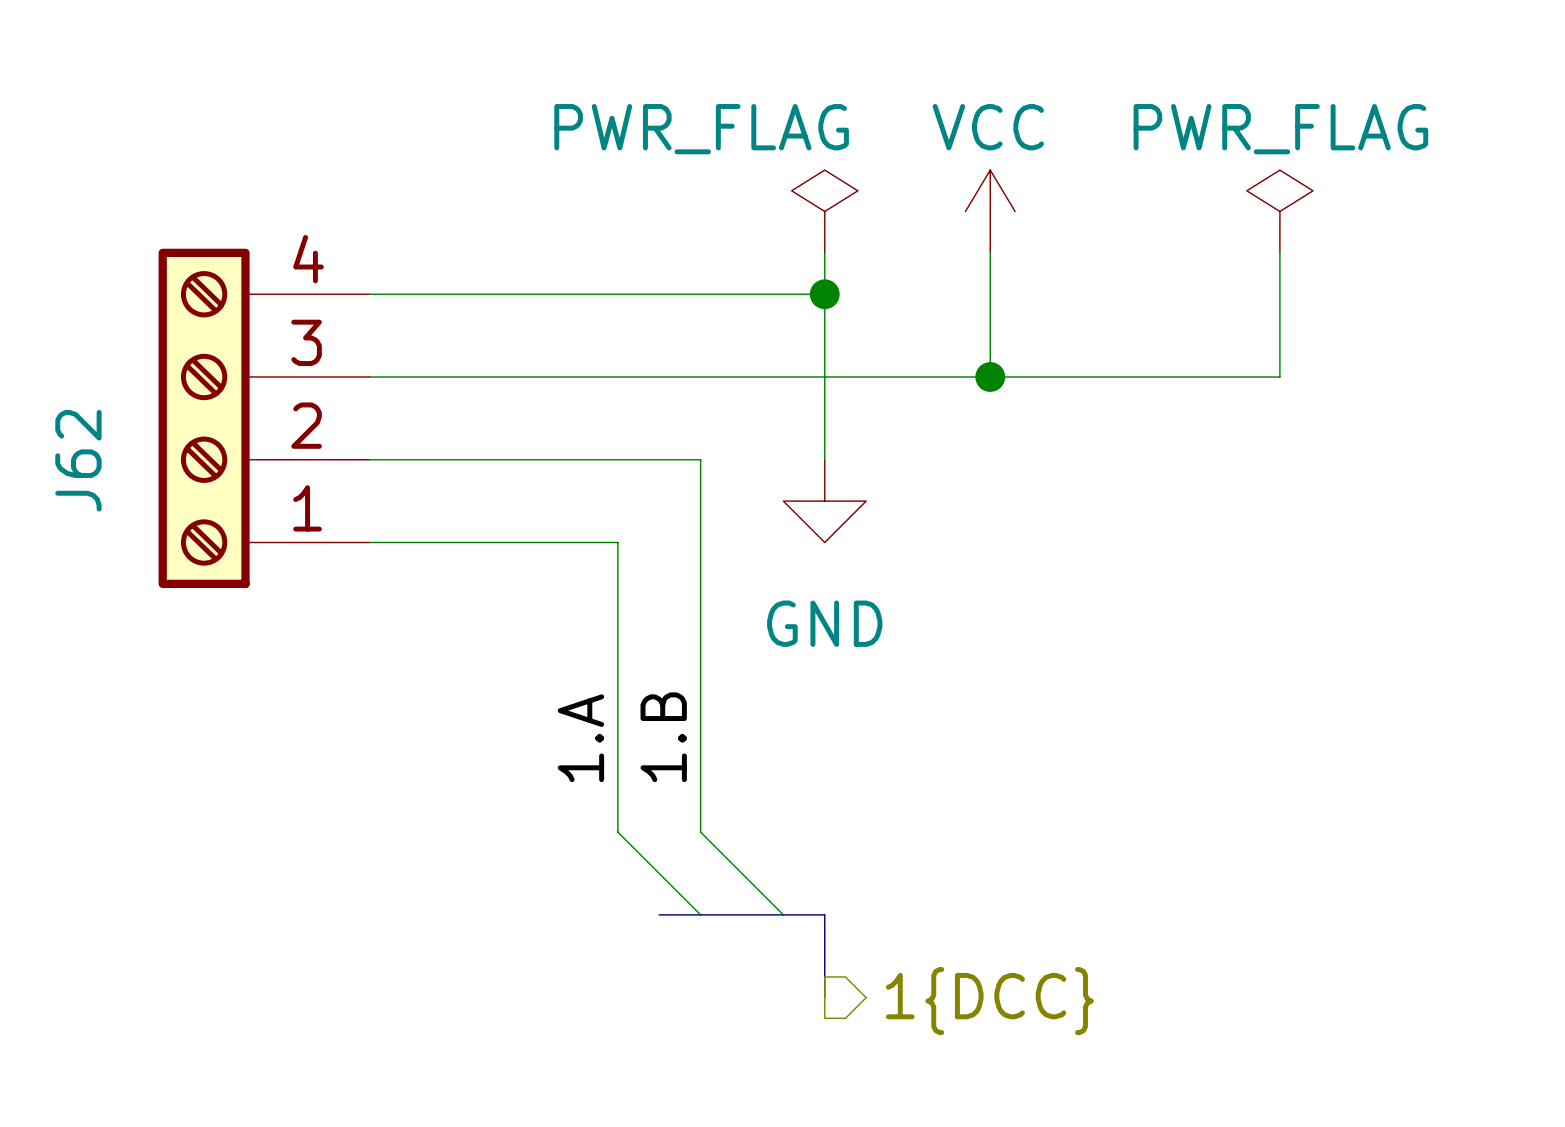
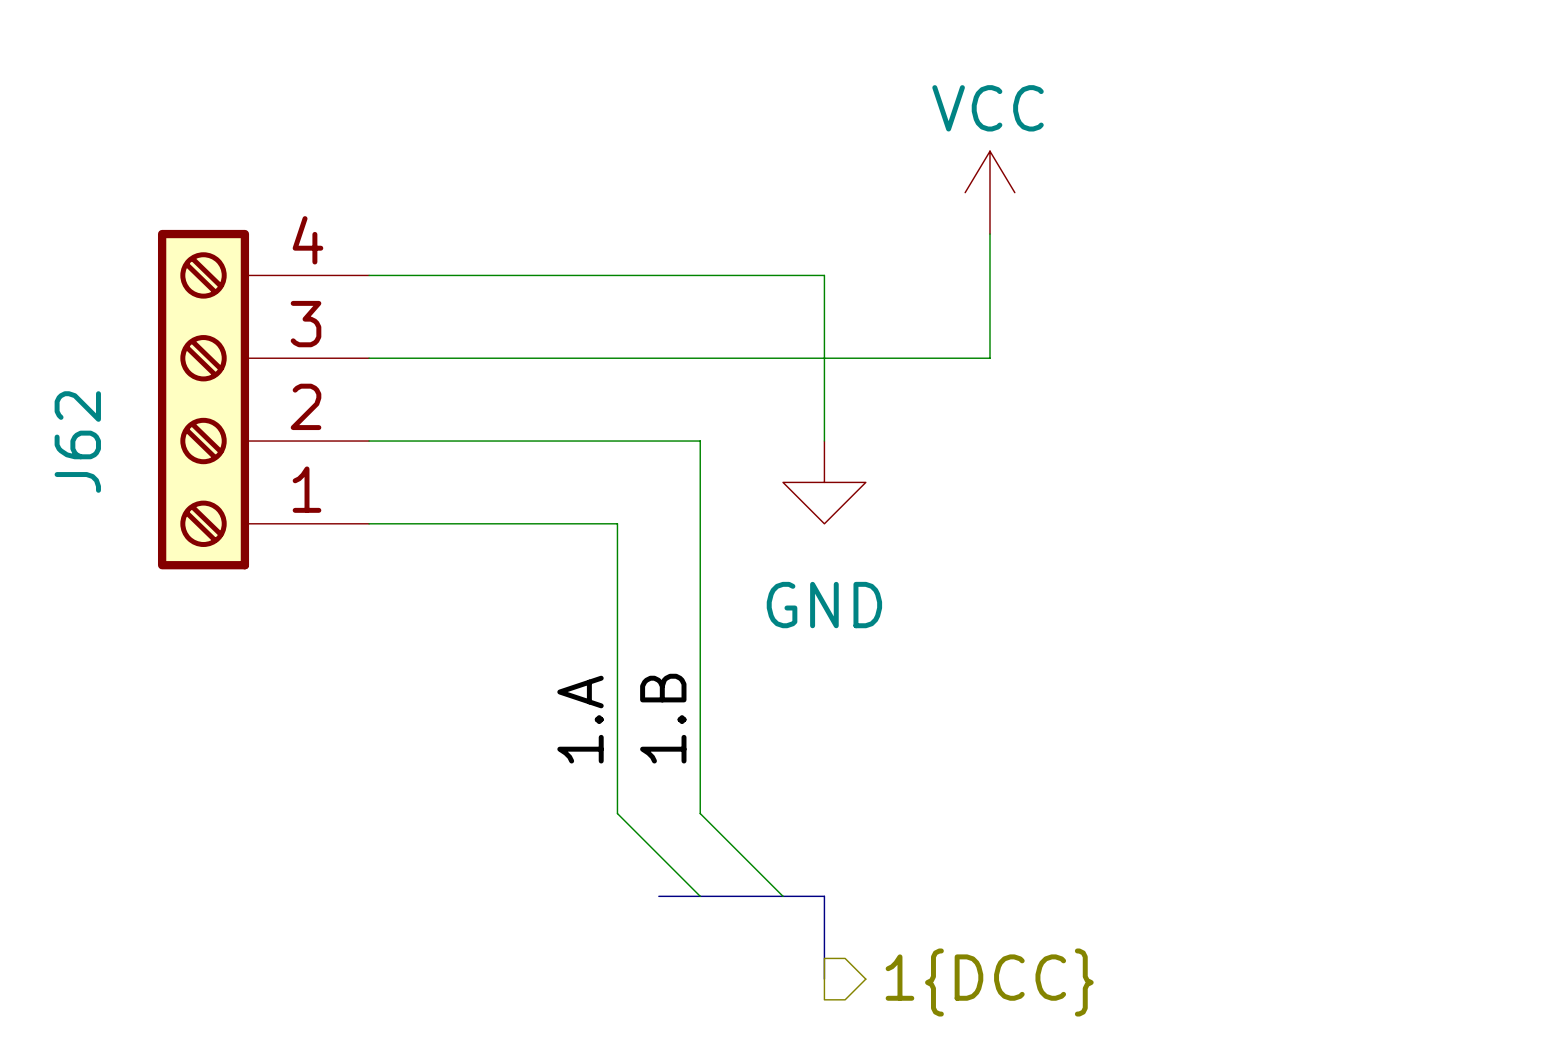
power symbol: PWR_FLAG (824, 211) -> none
power symbol: PWR_FLAG (1279, 211) -> none
wire: (824, 252) (824, 294) -> none
wire: (1279, 252) (1279, 376) (990, 376) -> none
junction: (824, 294) -> none
junction: (990, 376) -> none

